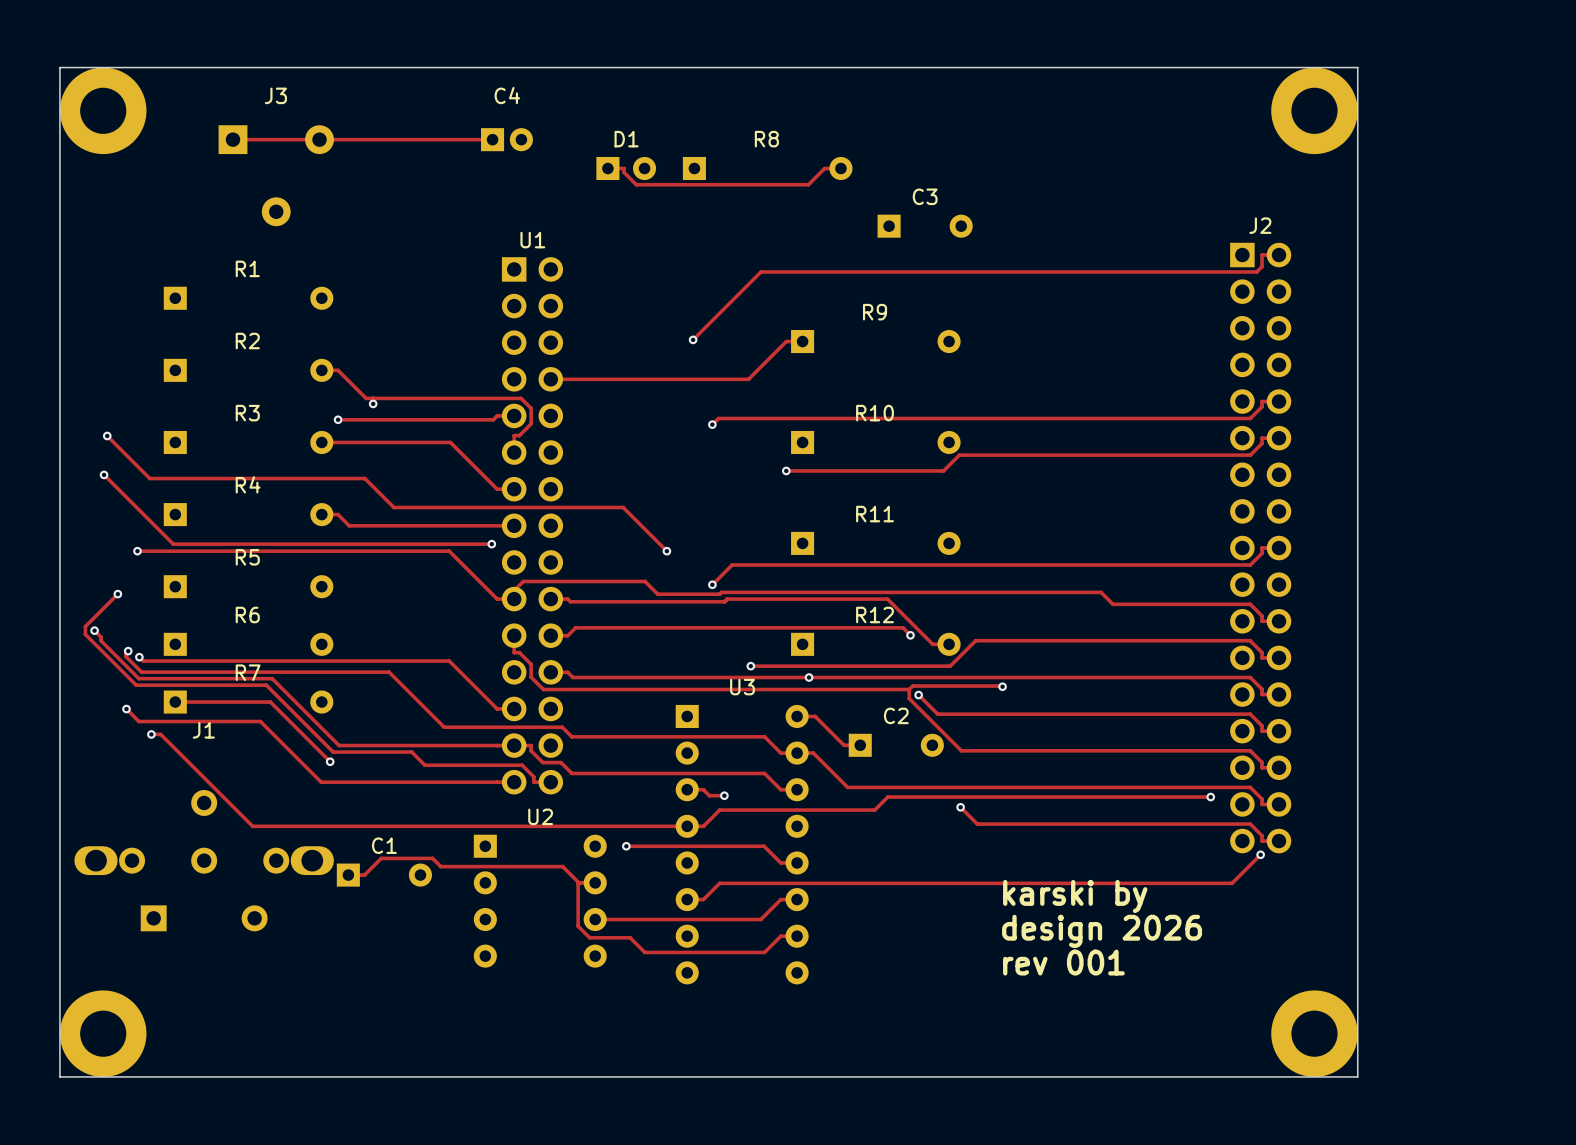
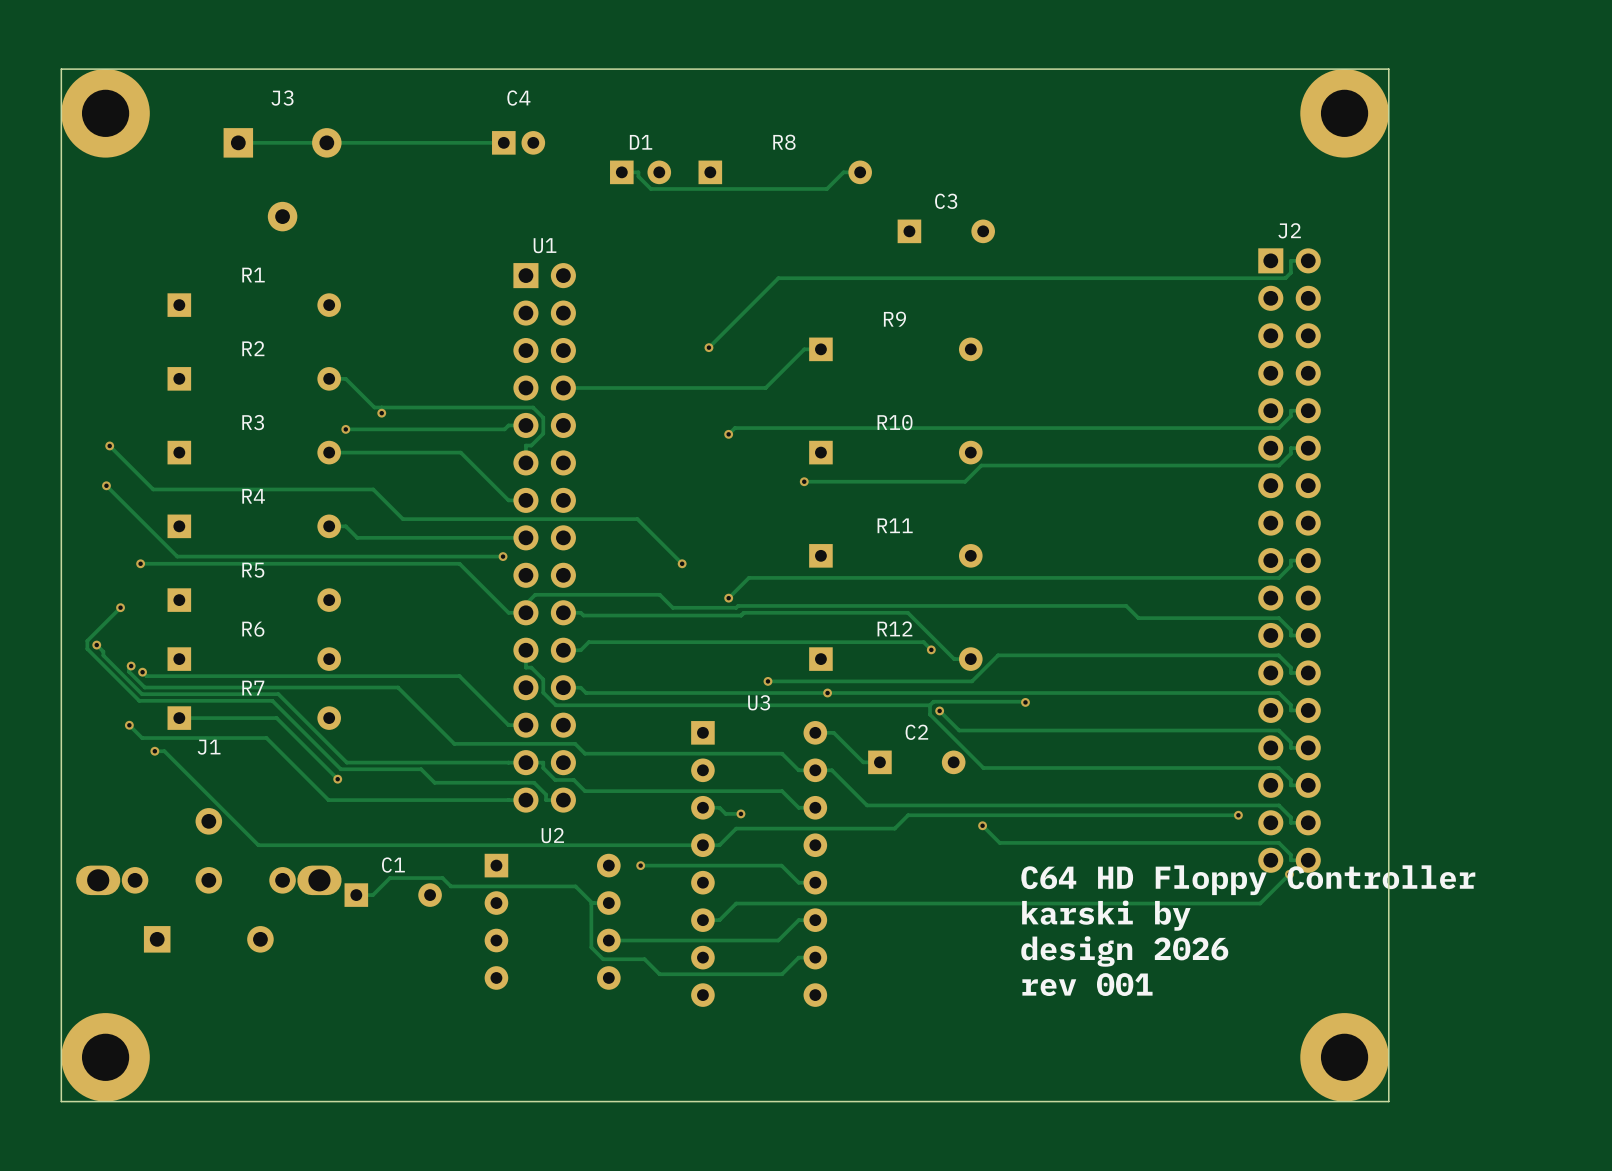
text: none -> C64 HD Floppy Controller (1248, 880)

